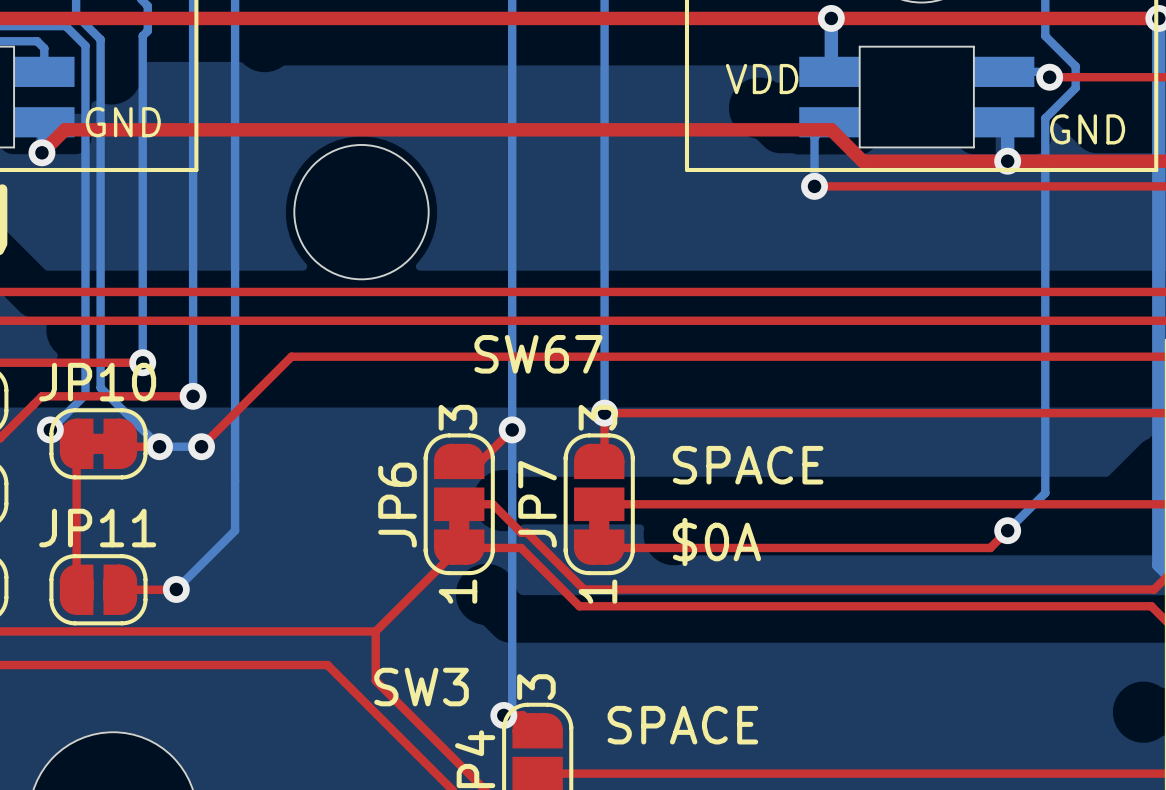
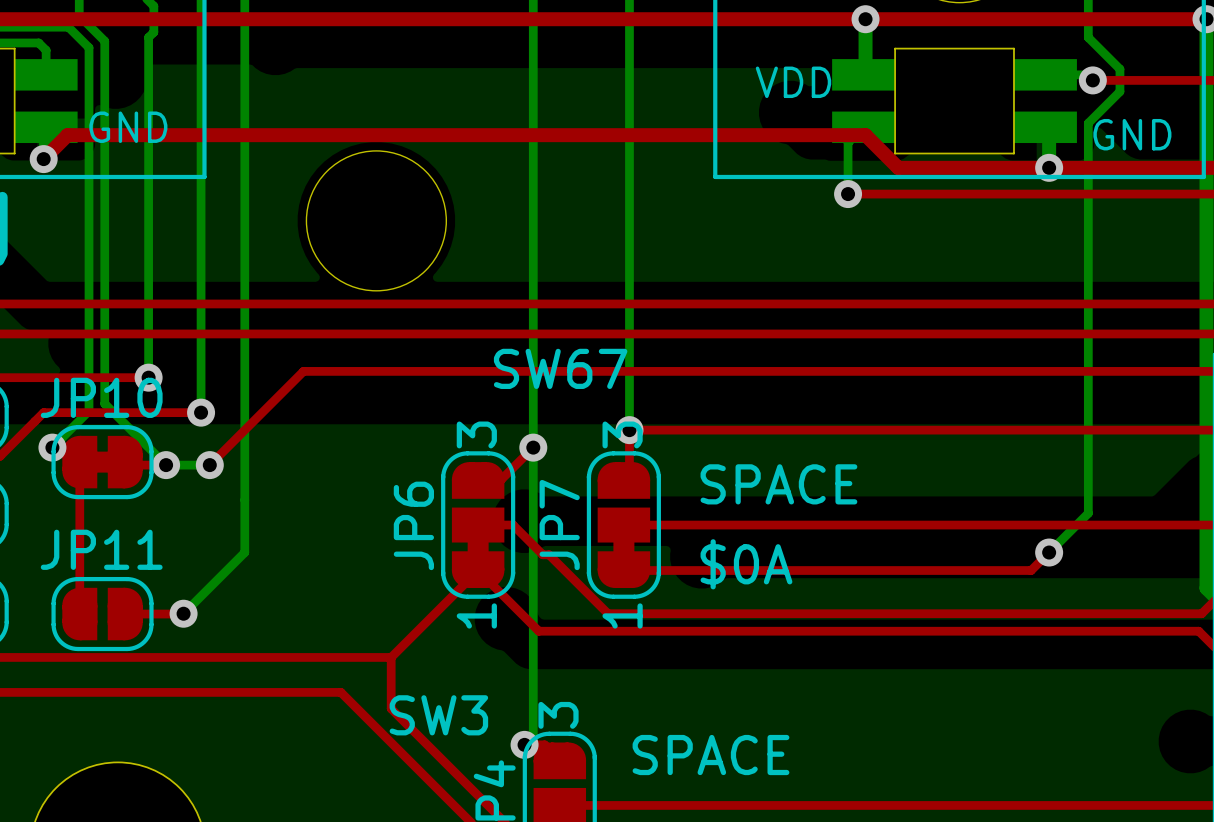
top track: (459, 547) (521, 547) (579, 606) -> (478, 570) (538, 631) (603, 631)

